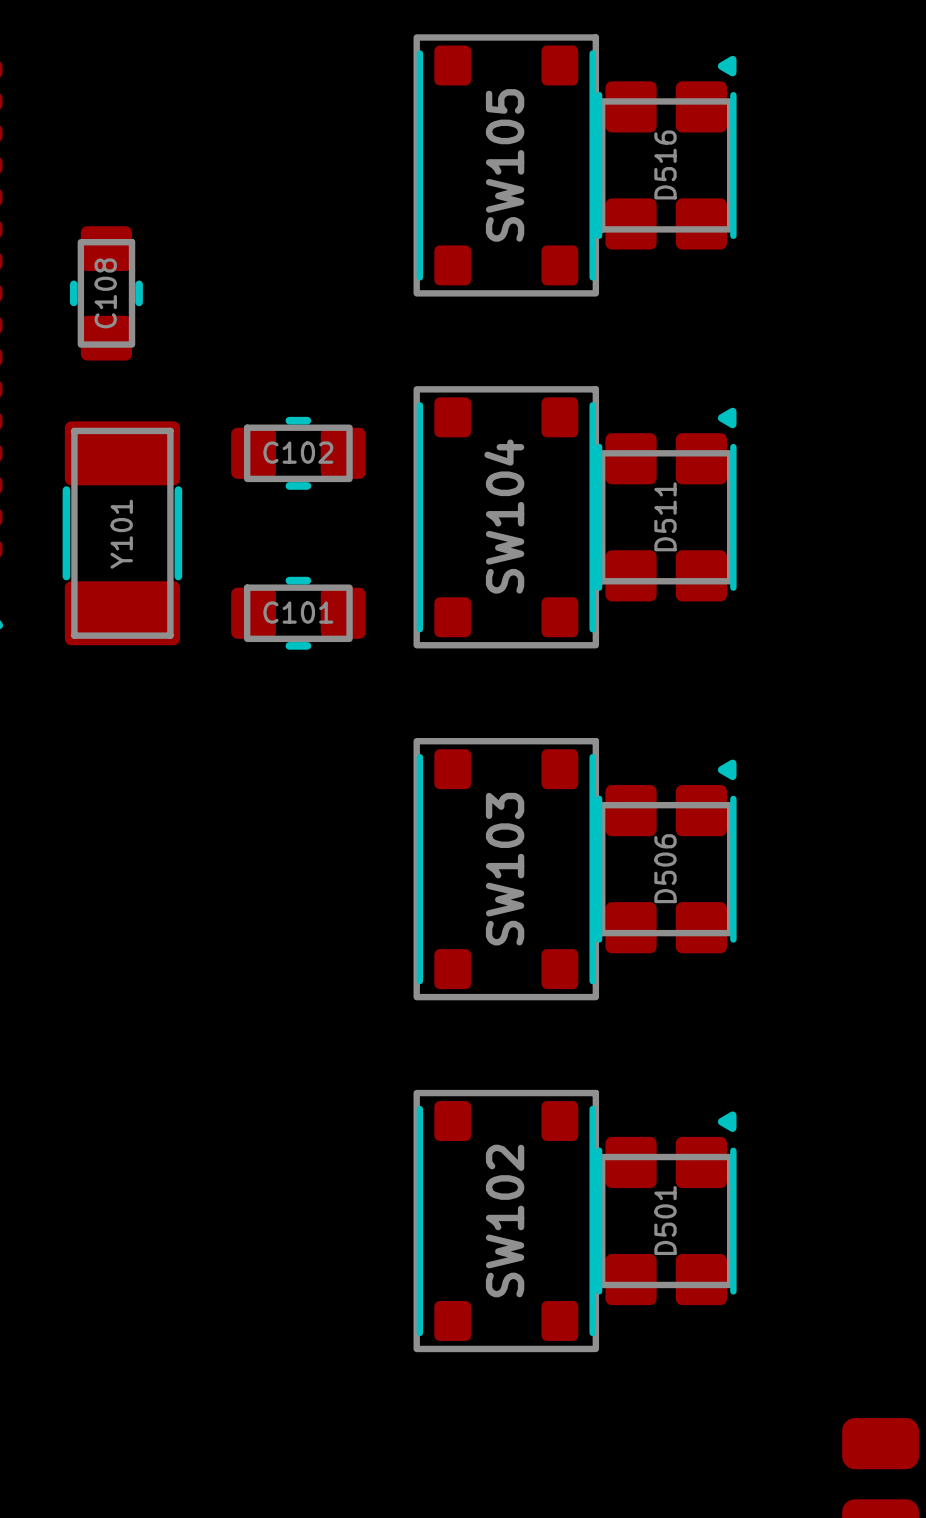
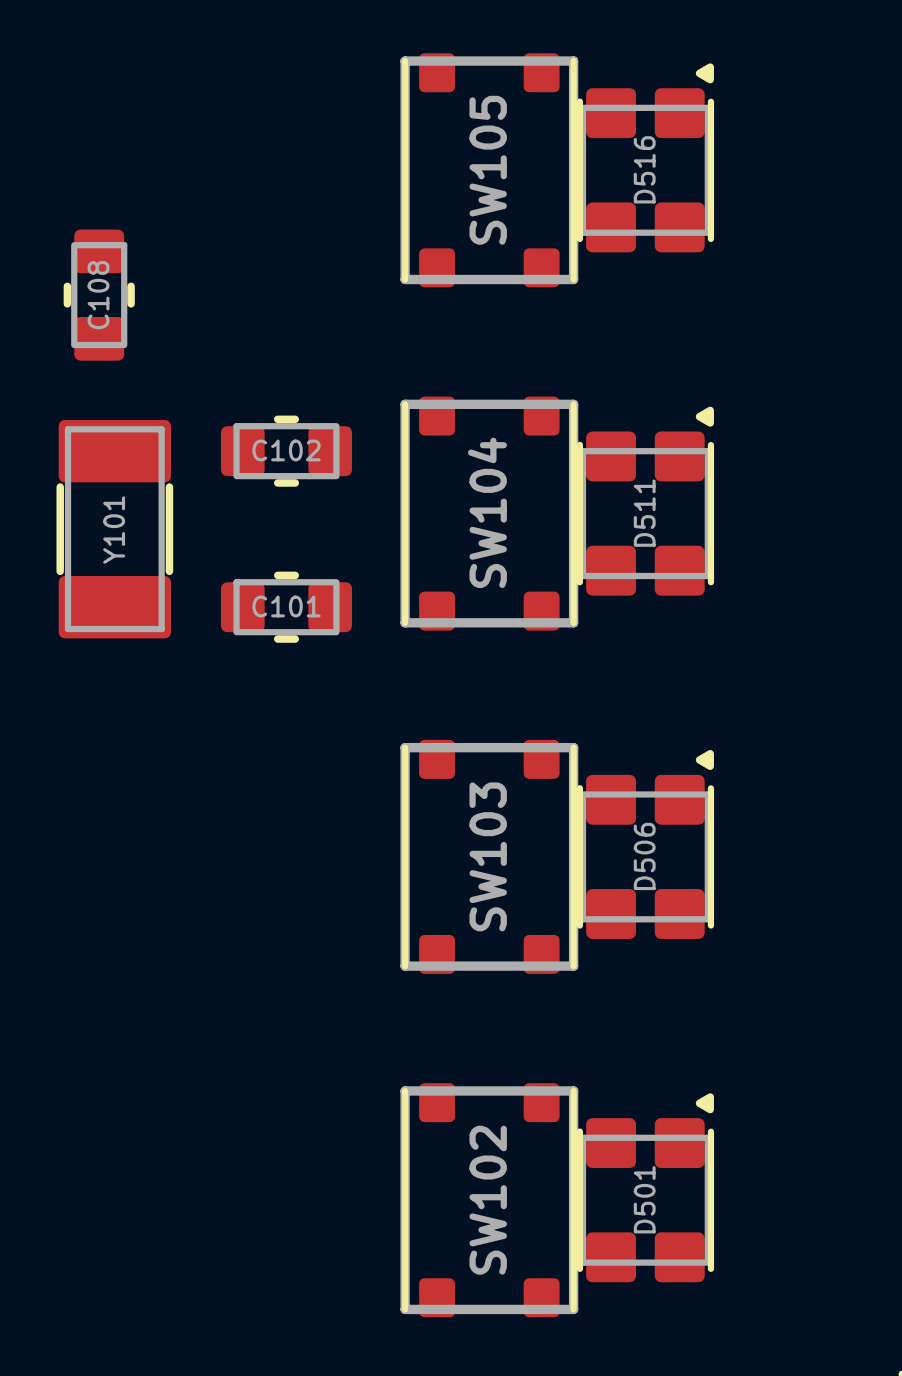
SW105 footprint: [413, 34, 600, 297] -> [400, 53, 579, 288]
SW104 footprint: [413, 386, 600, 649] -> [400, 396, 579, 631]
SW103 footprint: [413, 738, 600, 1001] -> [400, 739, 579, 974]
SW102 footprint: [413, 1089, 600, 1353] -> [400, 1083, 579, 1318]

